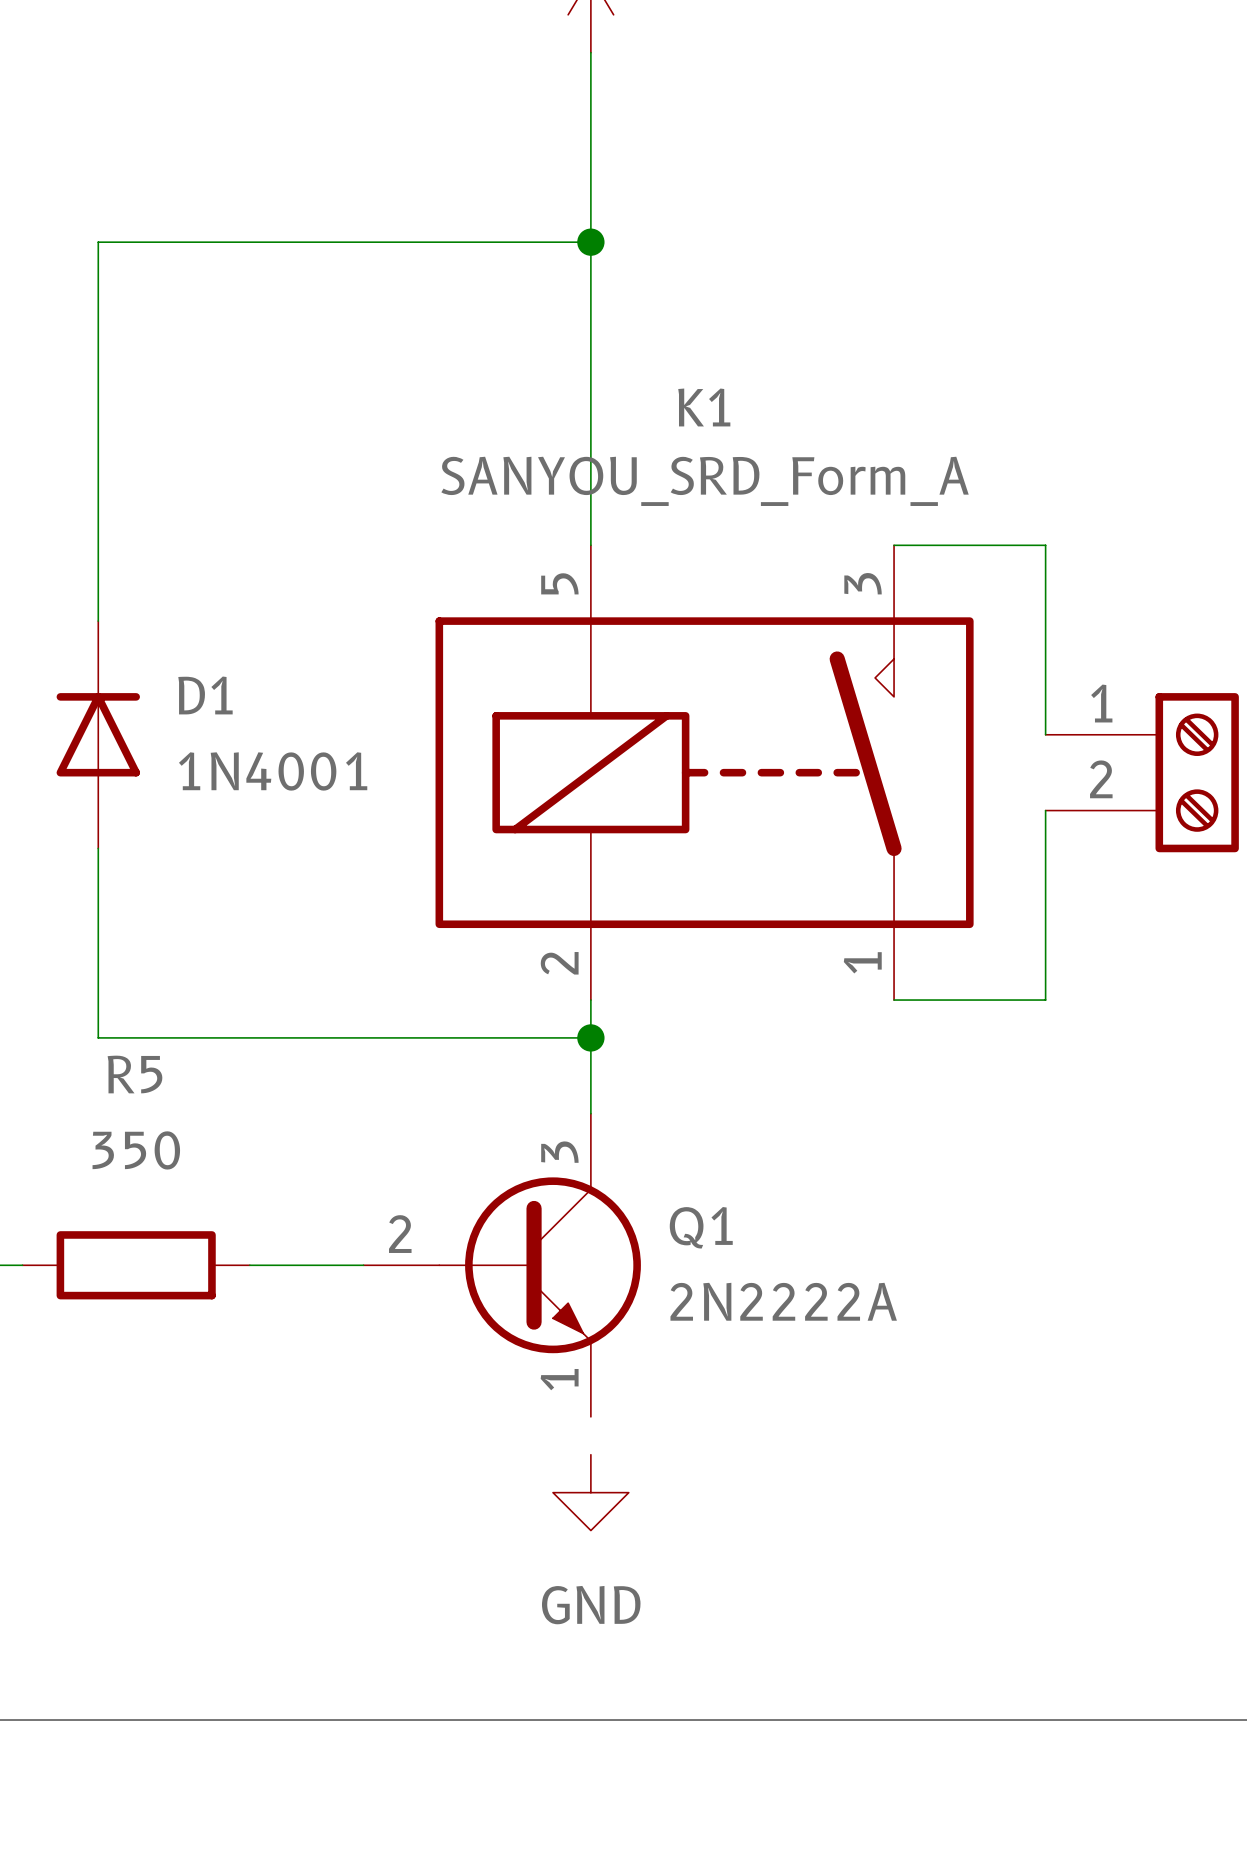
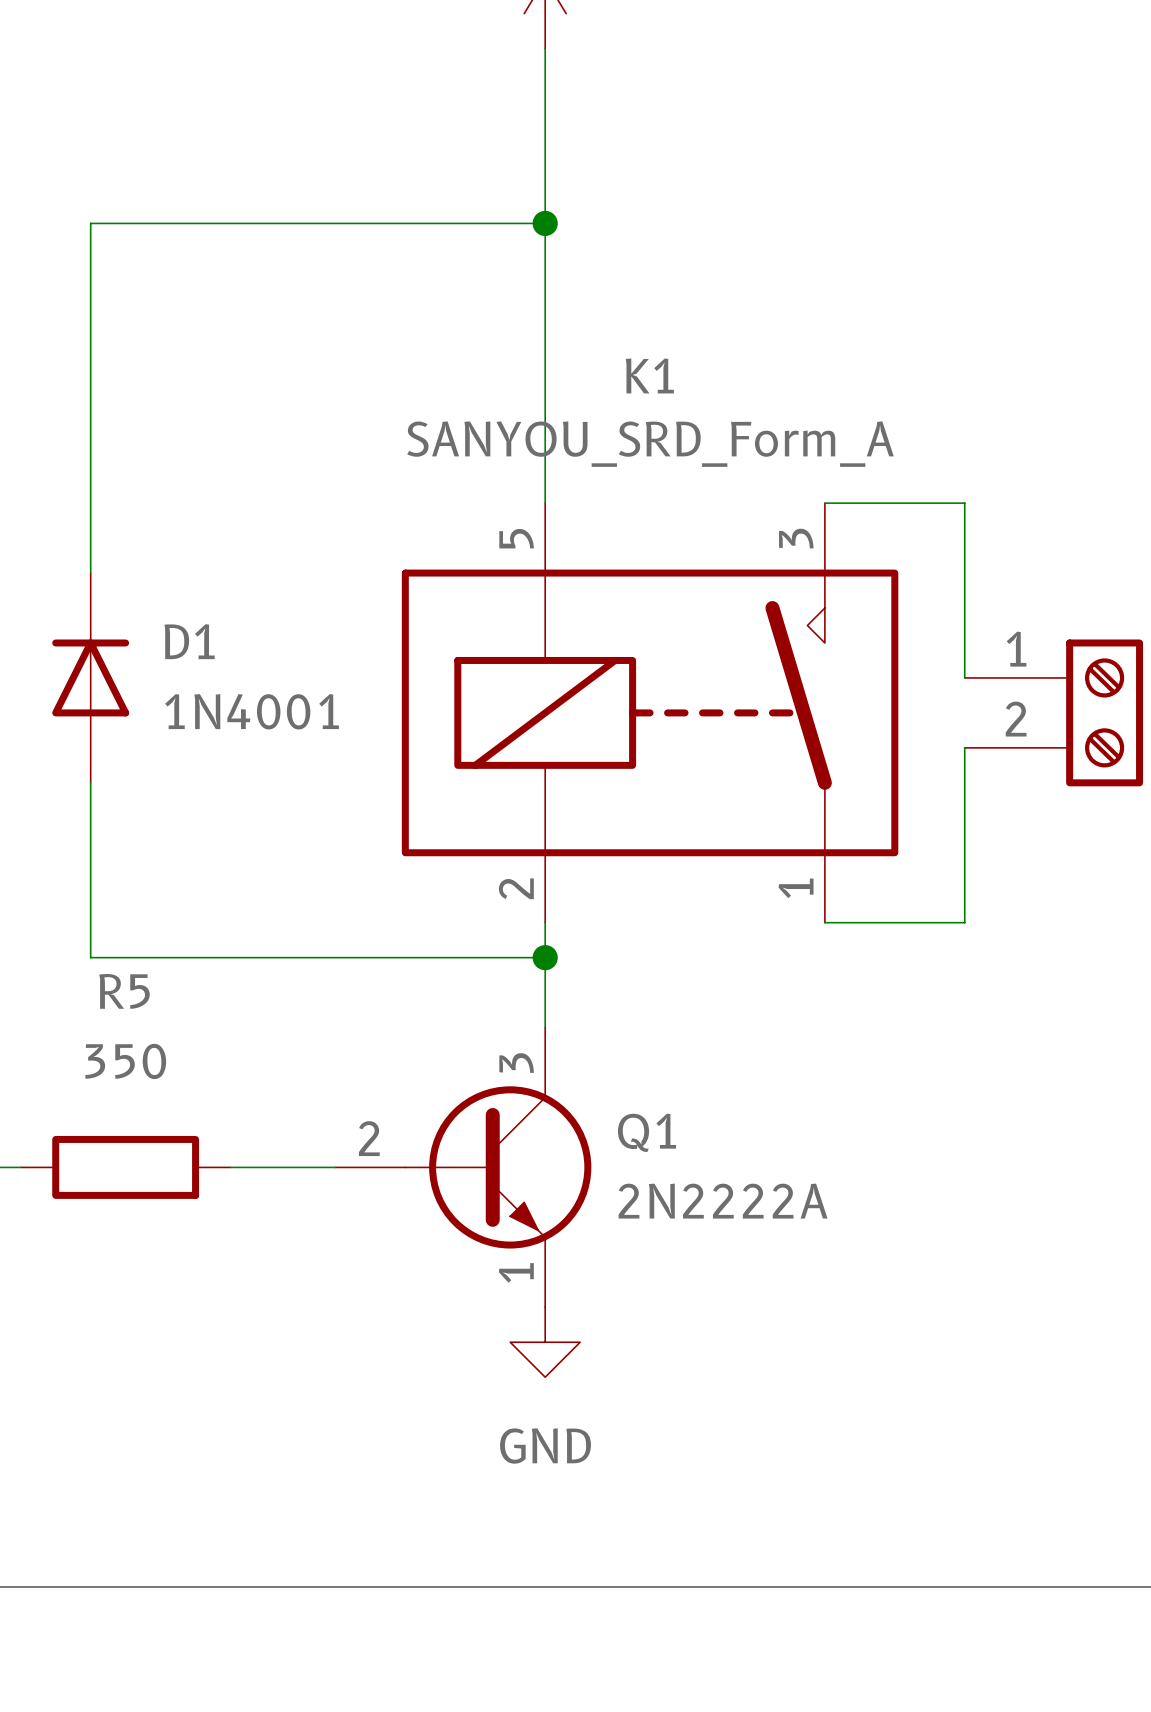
power symbol position: GND (590, 1492) -> GND (545, 1342)

